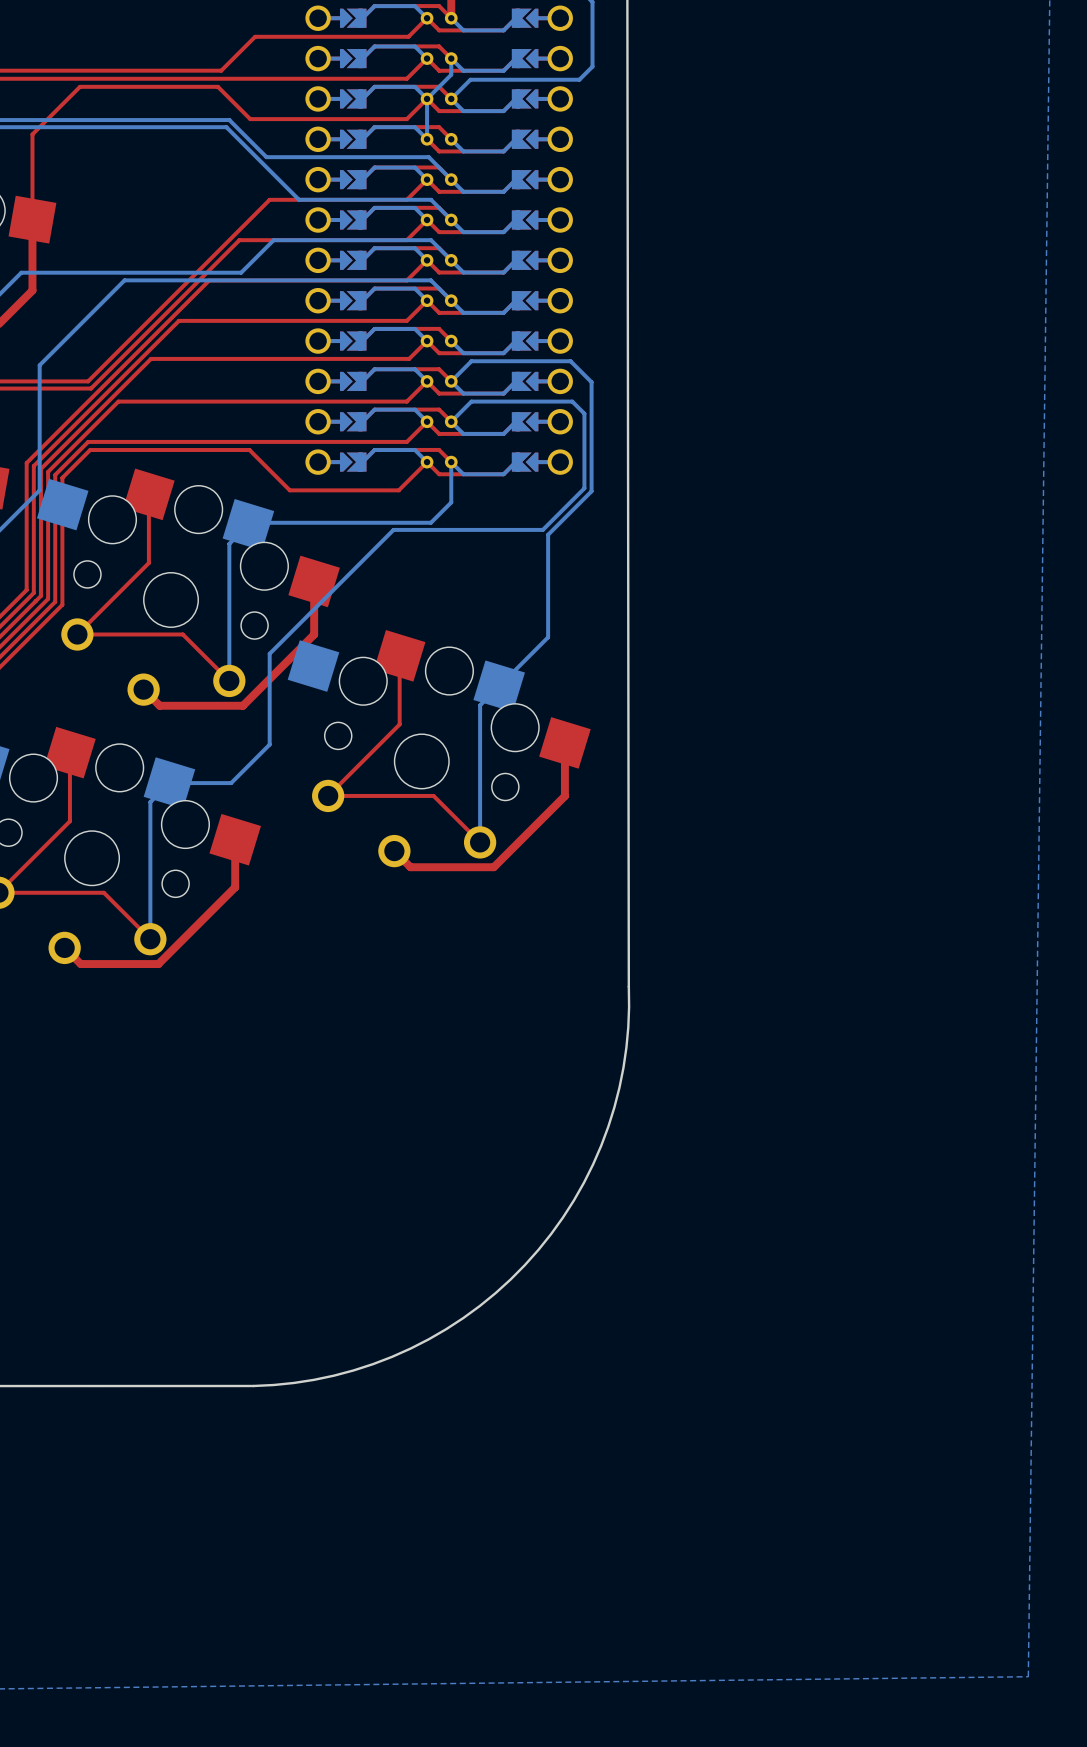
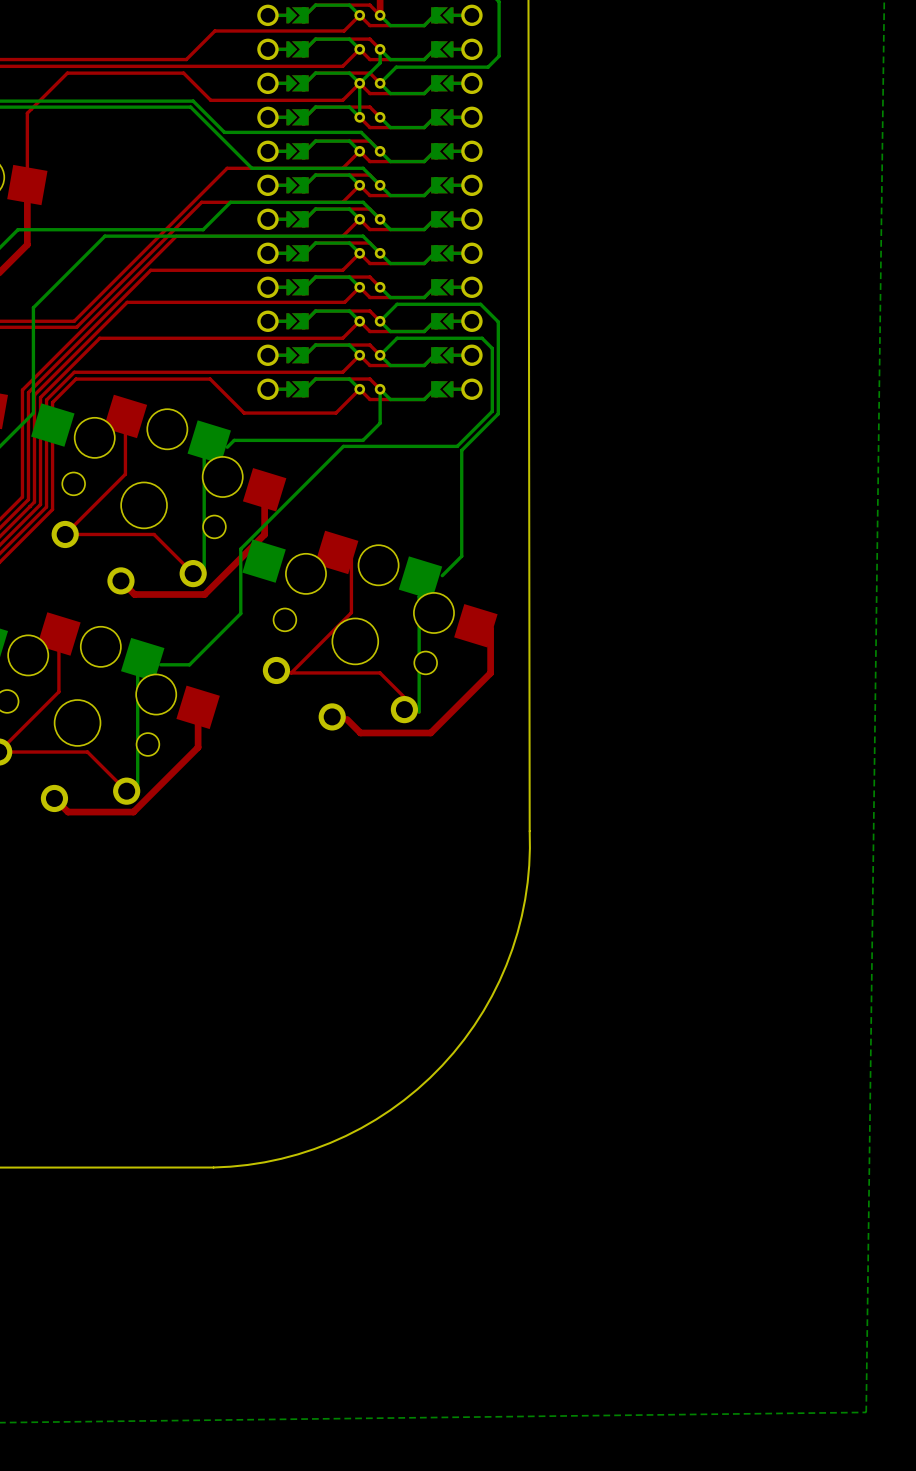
bottom track: (278, 522) (250, 522) (229, 543) (229, 680) -> (234, 440) (227, 447)
bottom track: none -> (220, 440) (204, 456) (204, 572)
bottom track: (407, 529) (393, 529) (269, 653) (269, 744) -> (343, 446) (240, 549) (240, 613) (227, 627)
bottom track: (548, 637) (480, 705) (480, 842) -> (461, 536) (461, 556) (442, 575)
top track: (399, 655) (399, 724) (328, 795) (433, 795) (480, 842) -> (351, 554) (351, 612) (291, 672) (380, 672) (419, 712)
bottom track: none -> (435, 580) (419, 596) (419, 712)
top track: (564, 742) (564, 796) (493, 867) (410, 867) (394, 851) -> (490, 628) (490, 673) (430, 732) (360, 732) (346, 719)
bottom track: none -> (153, 658) (137, 674) (137, 789)
bottom track: (231, 783) (169, 783) (150, 802) (150, 939) -> (194, 659) (189, 664) (160, 664)

